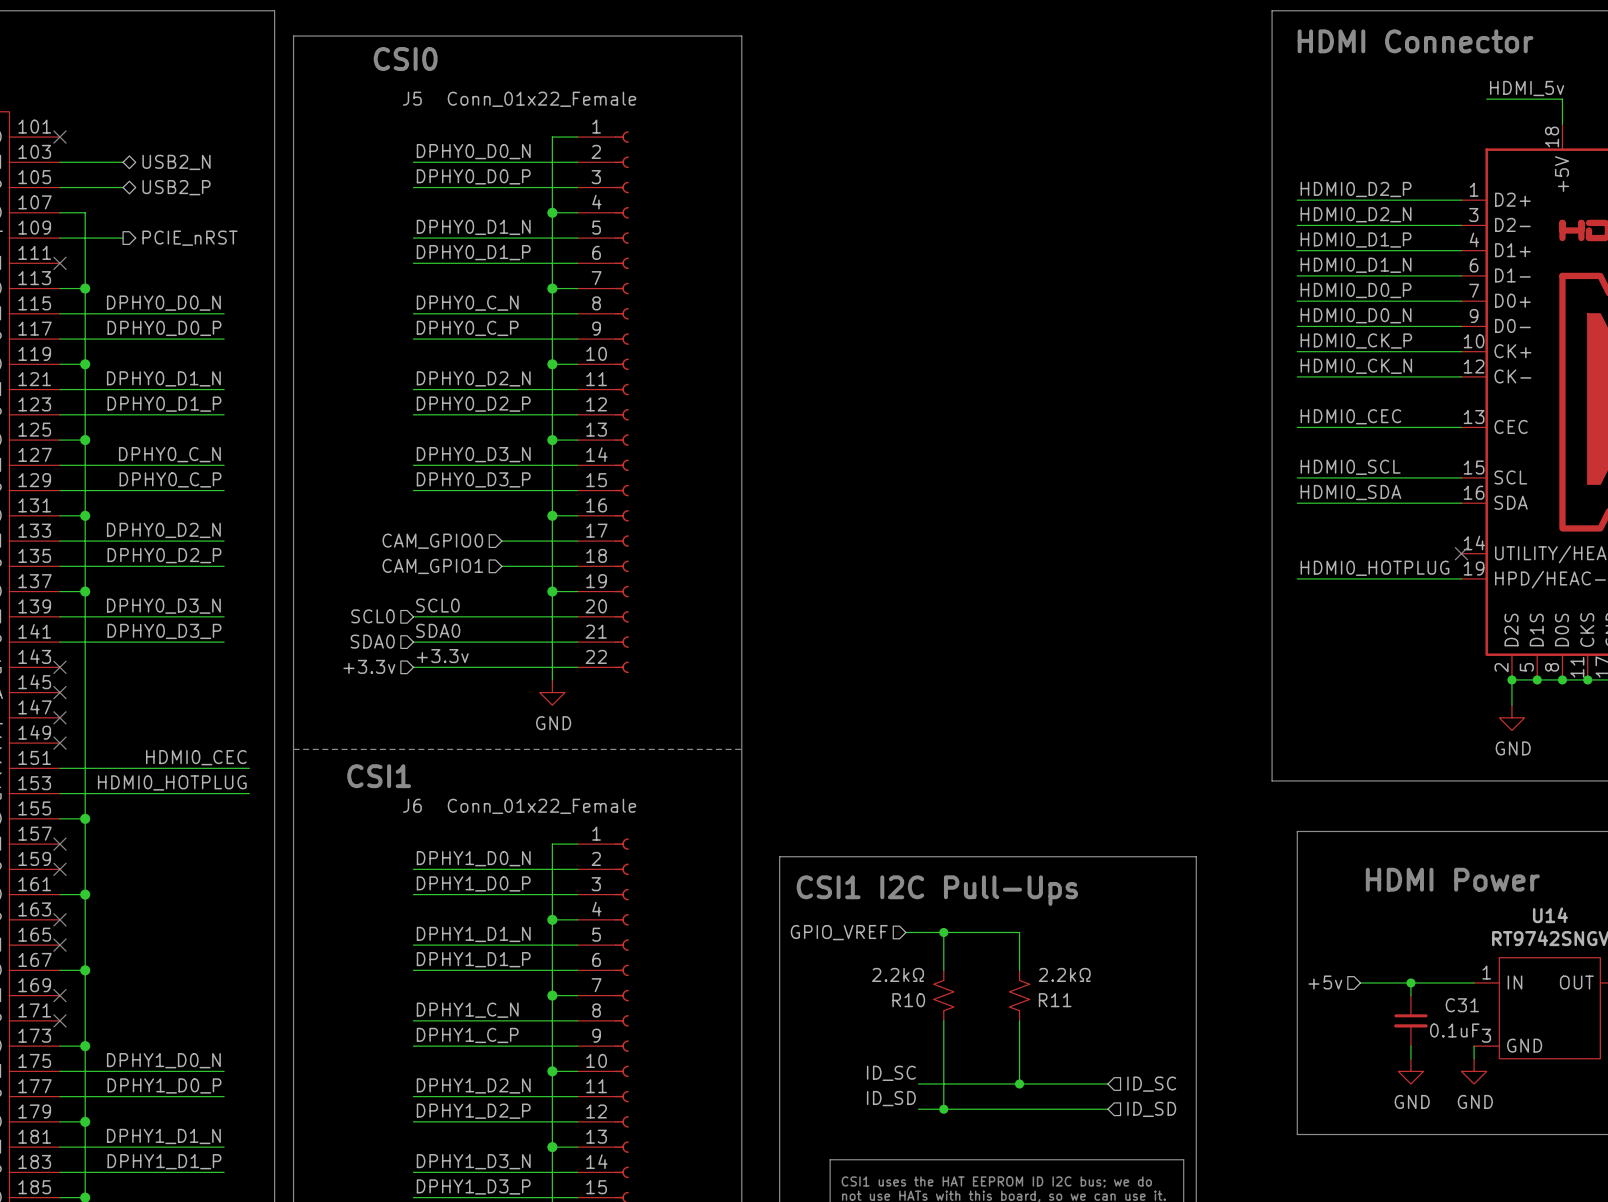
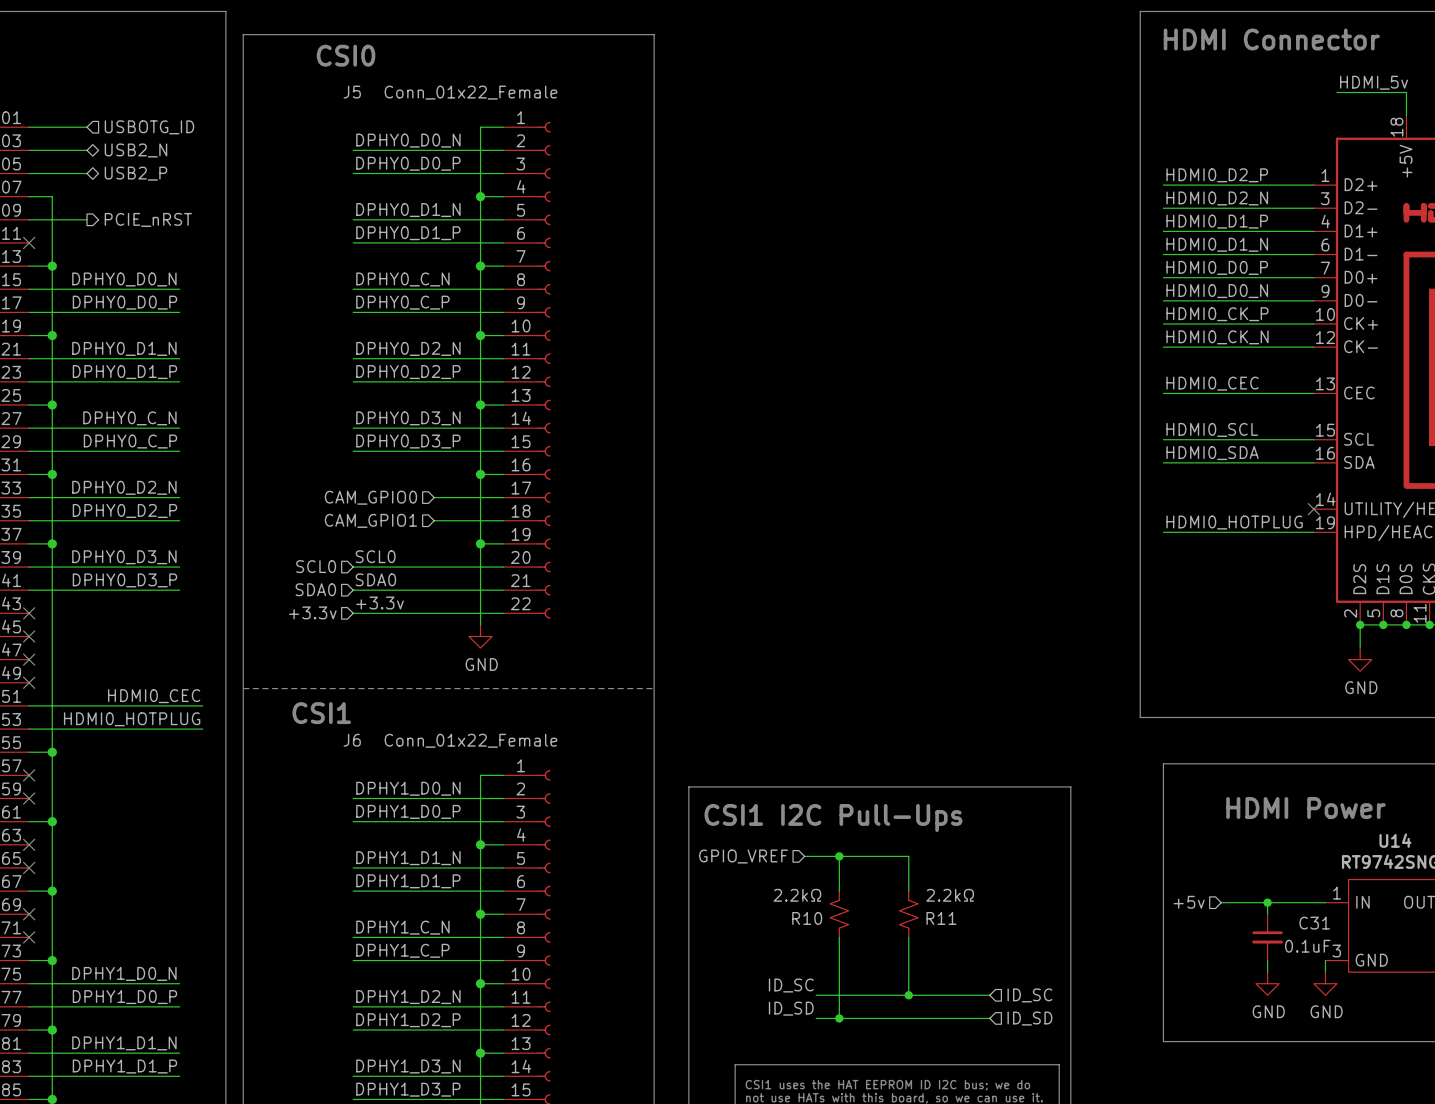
wire: none -> (29, 127) (87, 127)
no-connect mark: (59, 137) -> none
hierarchical label: none -> USBOTG_ID (149, 127)

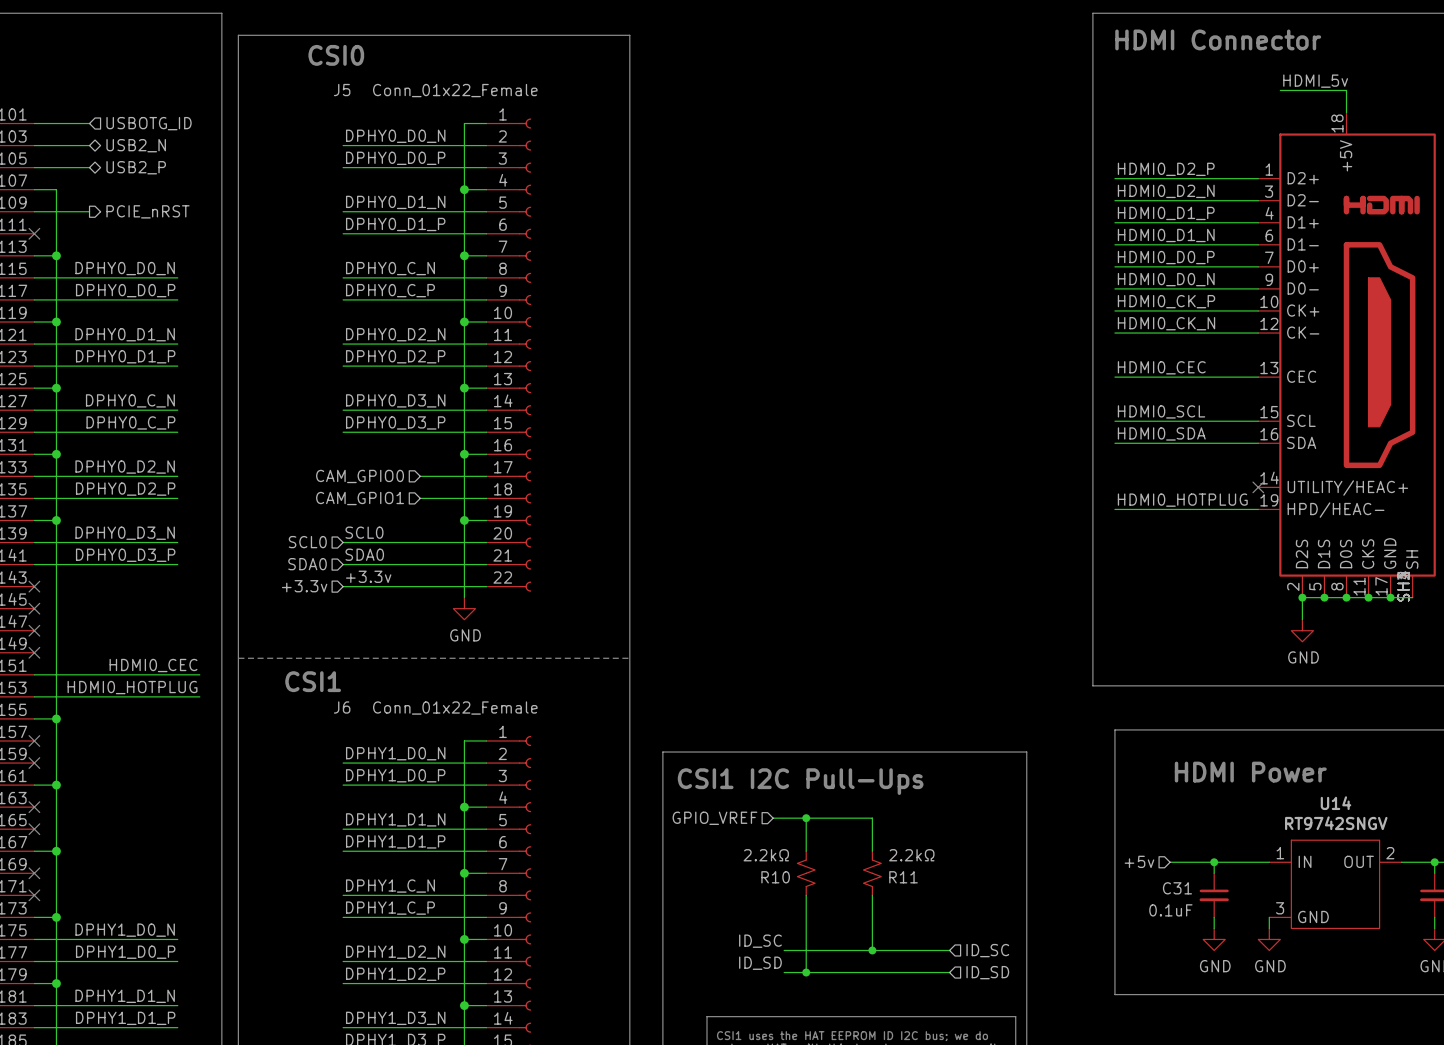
C31 name position: C31 (1314, 923) -> C31 (1177, 888)
C31 value position: 0.1uF (1307, 946) -> 0.1uF (1170, 910)

